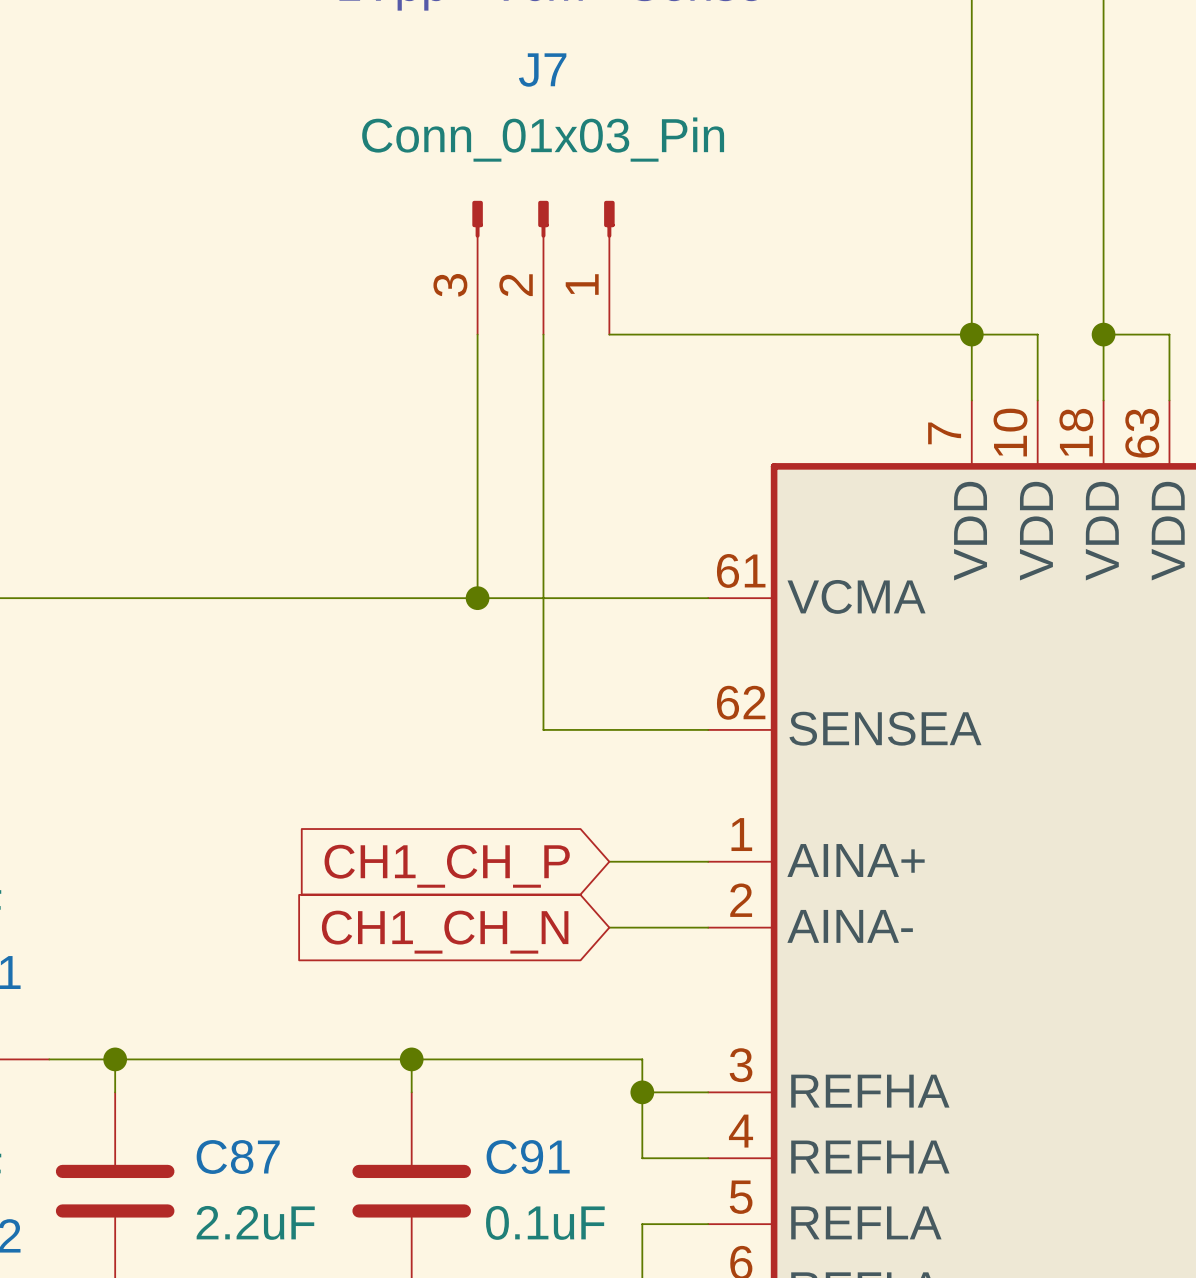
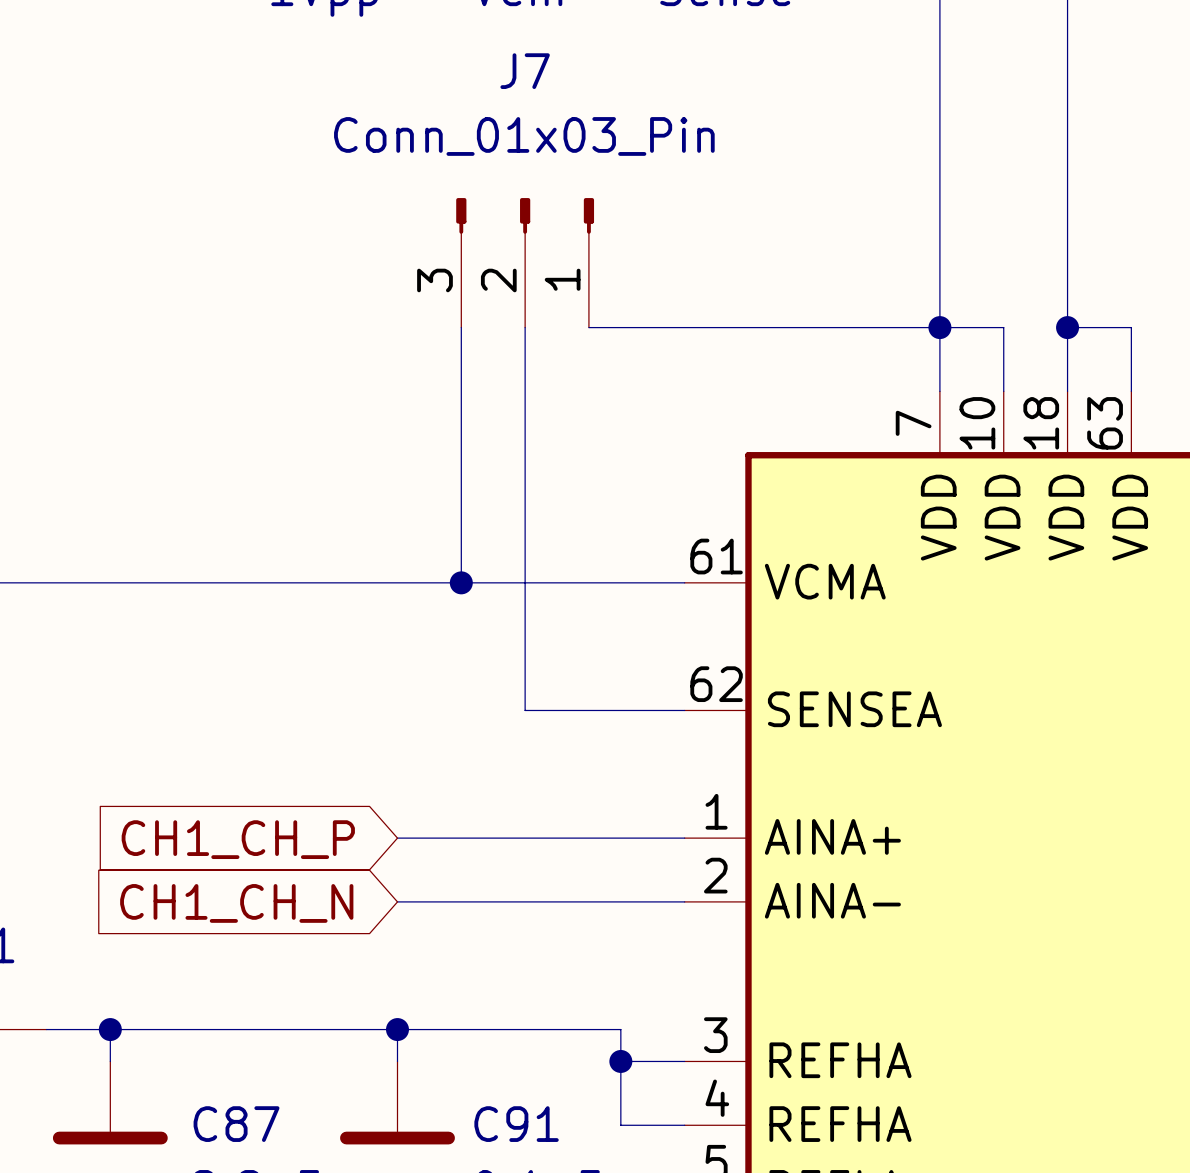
wire: none -> (397, 838) (588, 838)
global label position: CH1_CH_P (447, 866) -> CH1_CH_P (238, 839)
wire: none -> (397, 901) (588, 901)
global label position: CH1_CH_N (445, 932) -> CH1_CH_N (236, 903)

